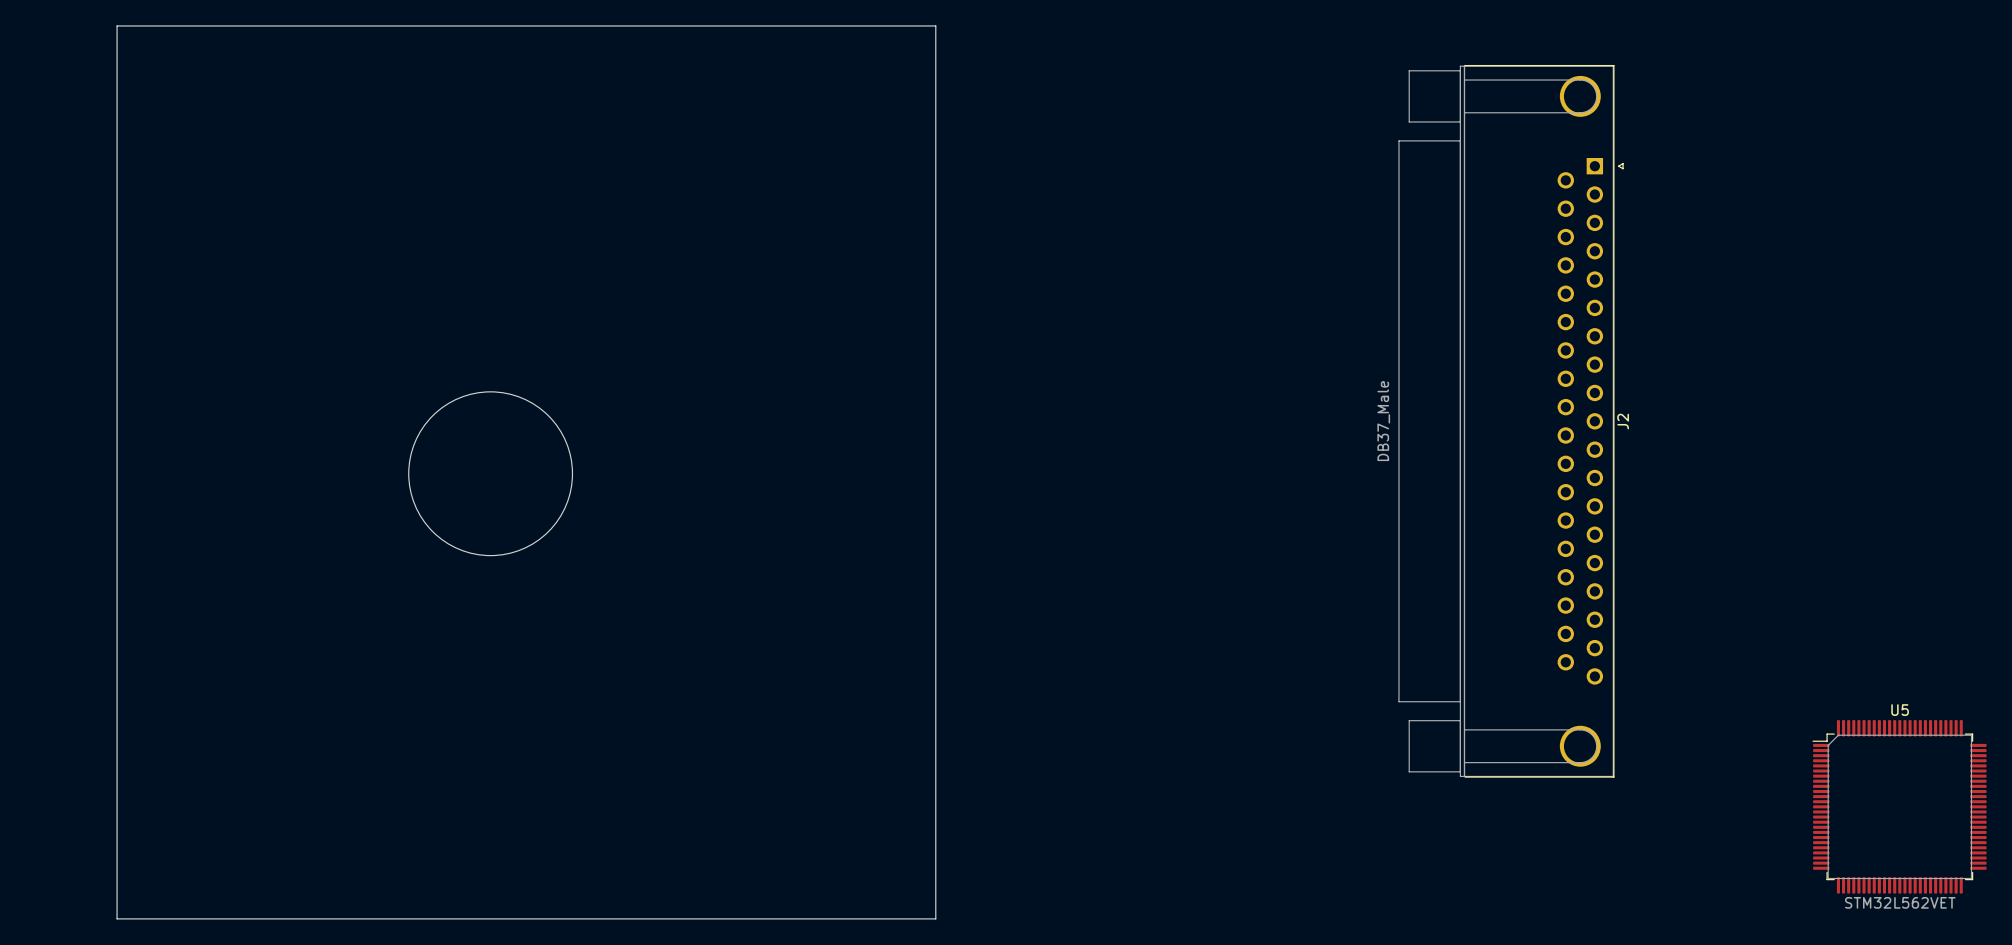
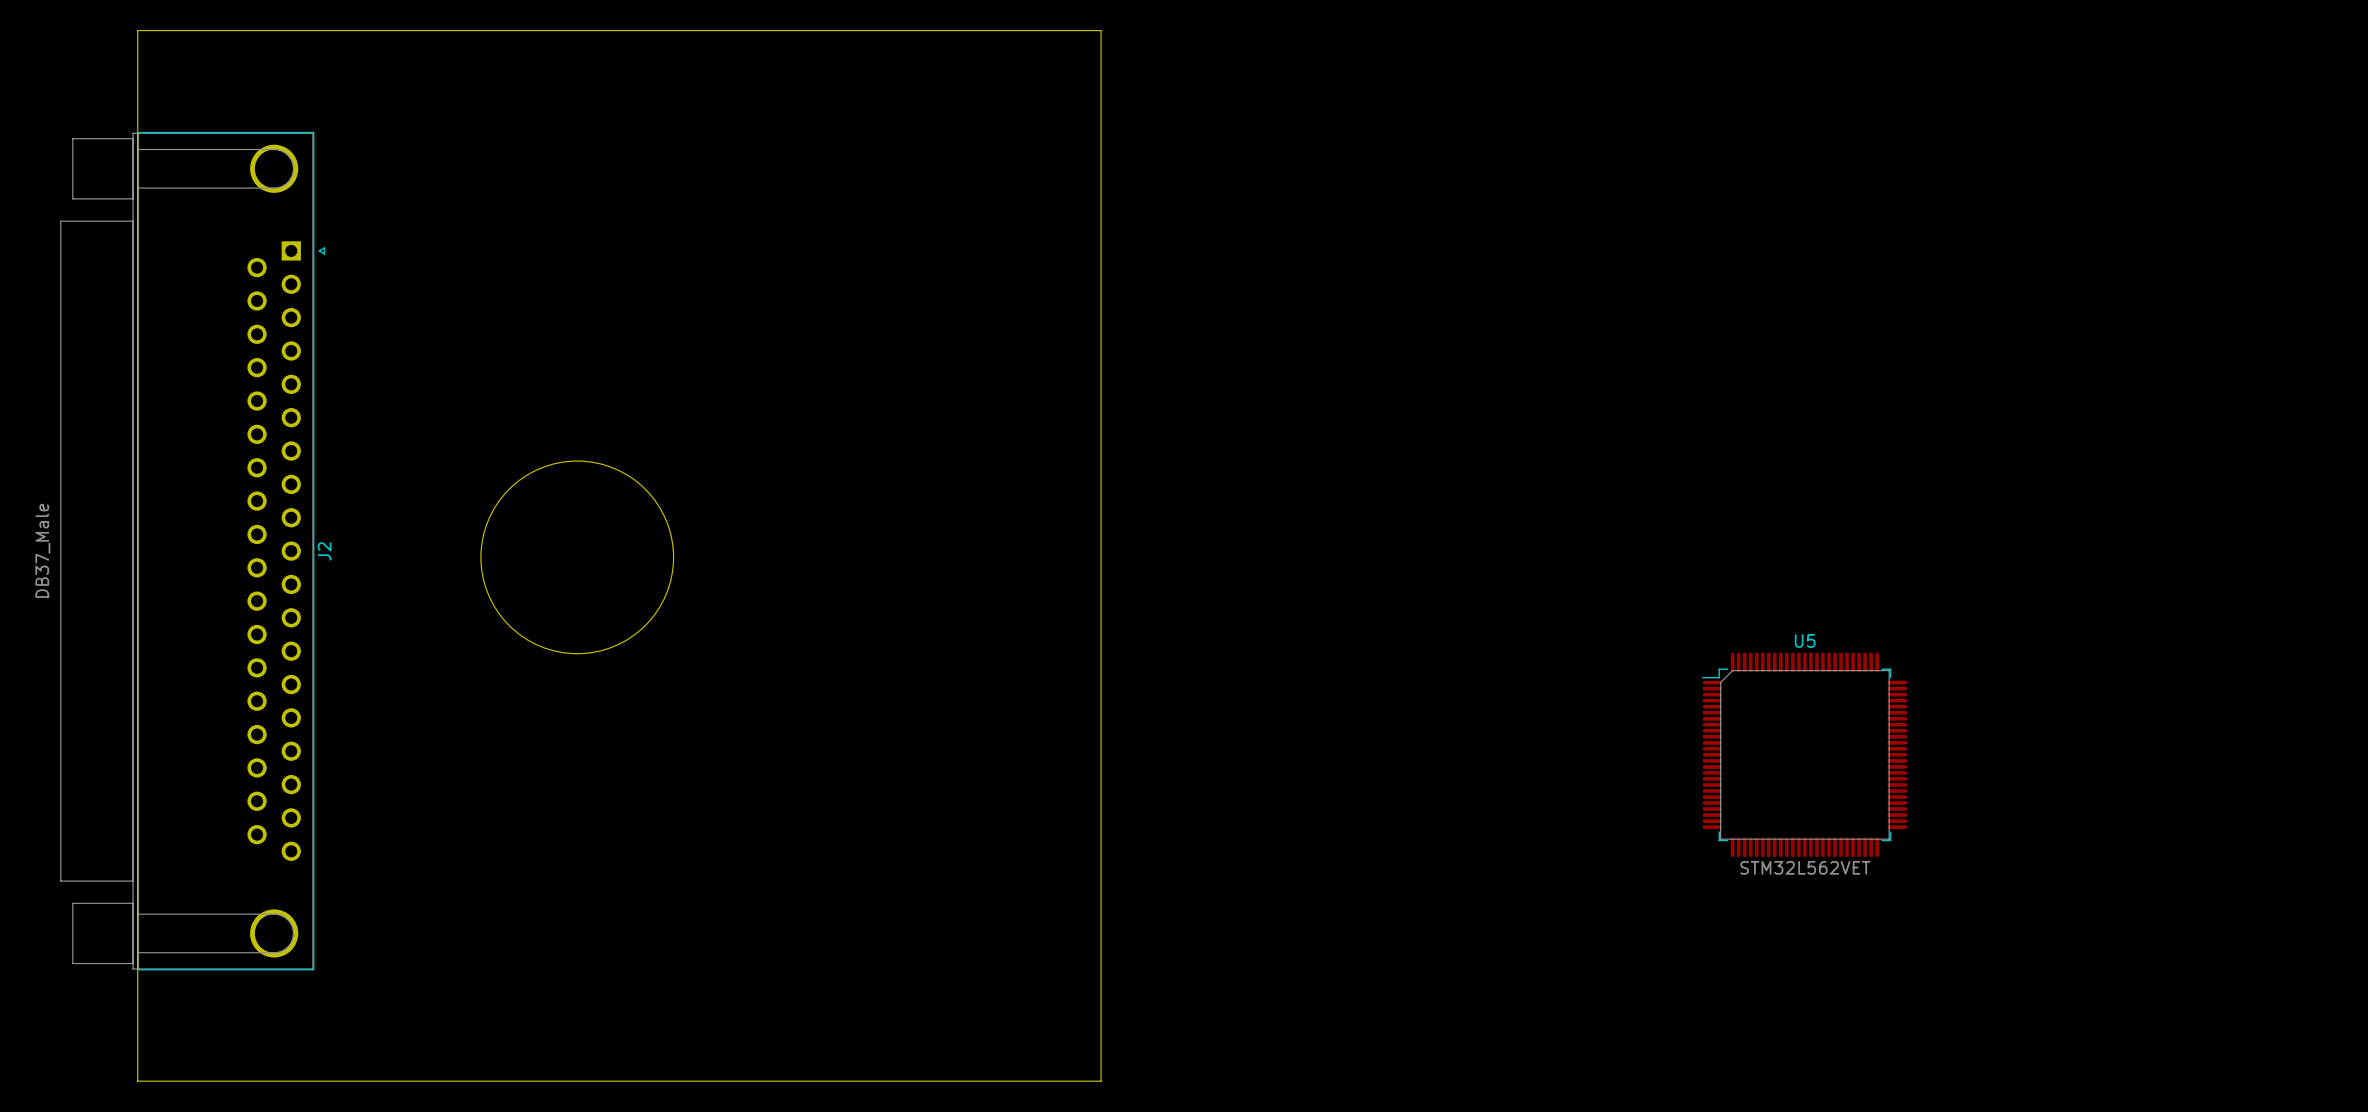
J2 position: (1511, 421) -> (192, 551)
U5 position: (1899, 806) -> (1804, 754)

